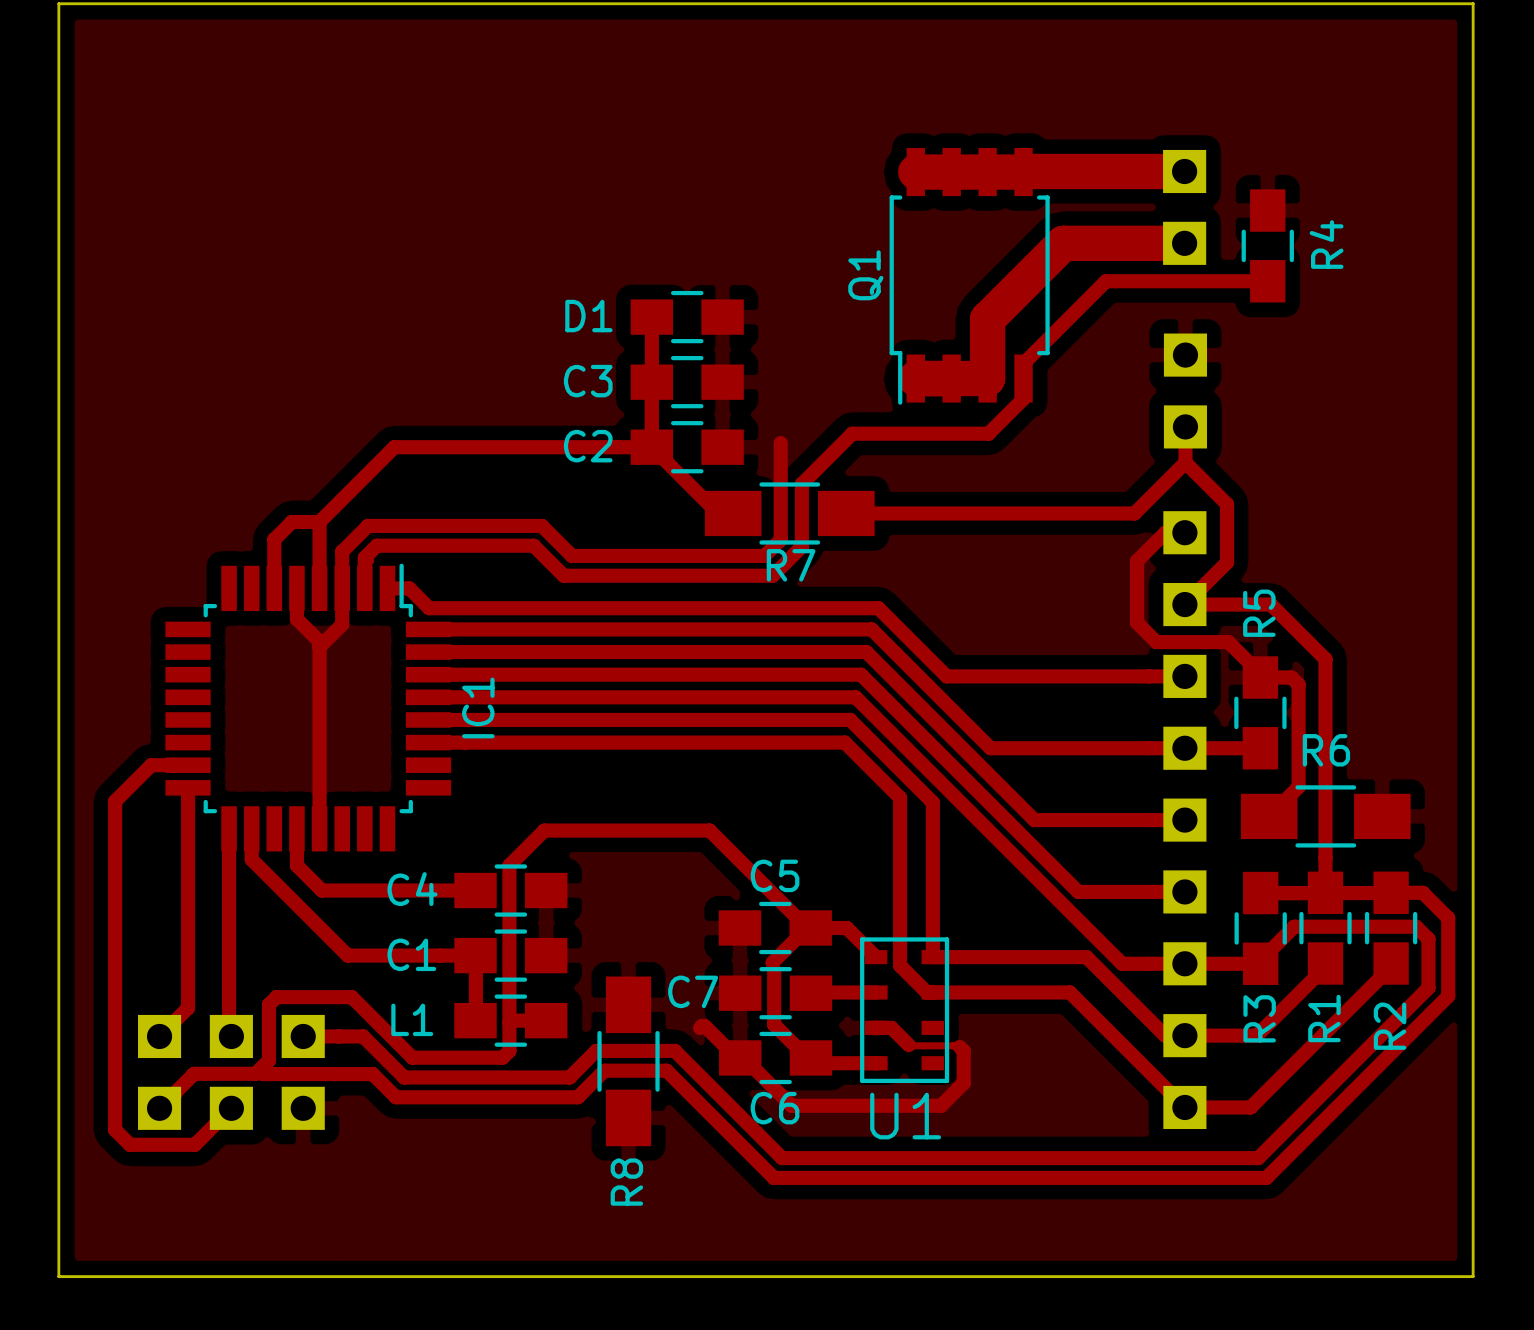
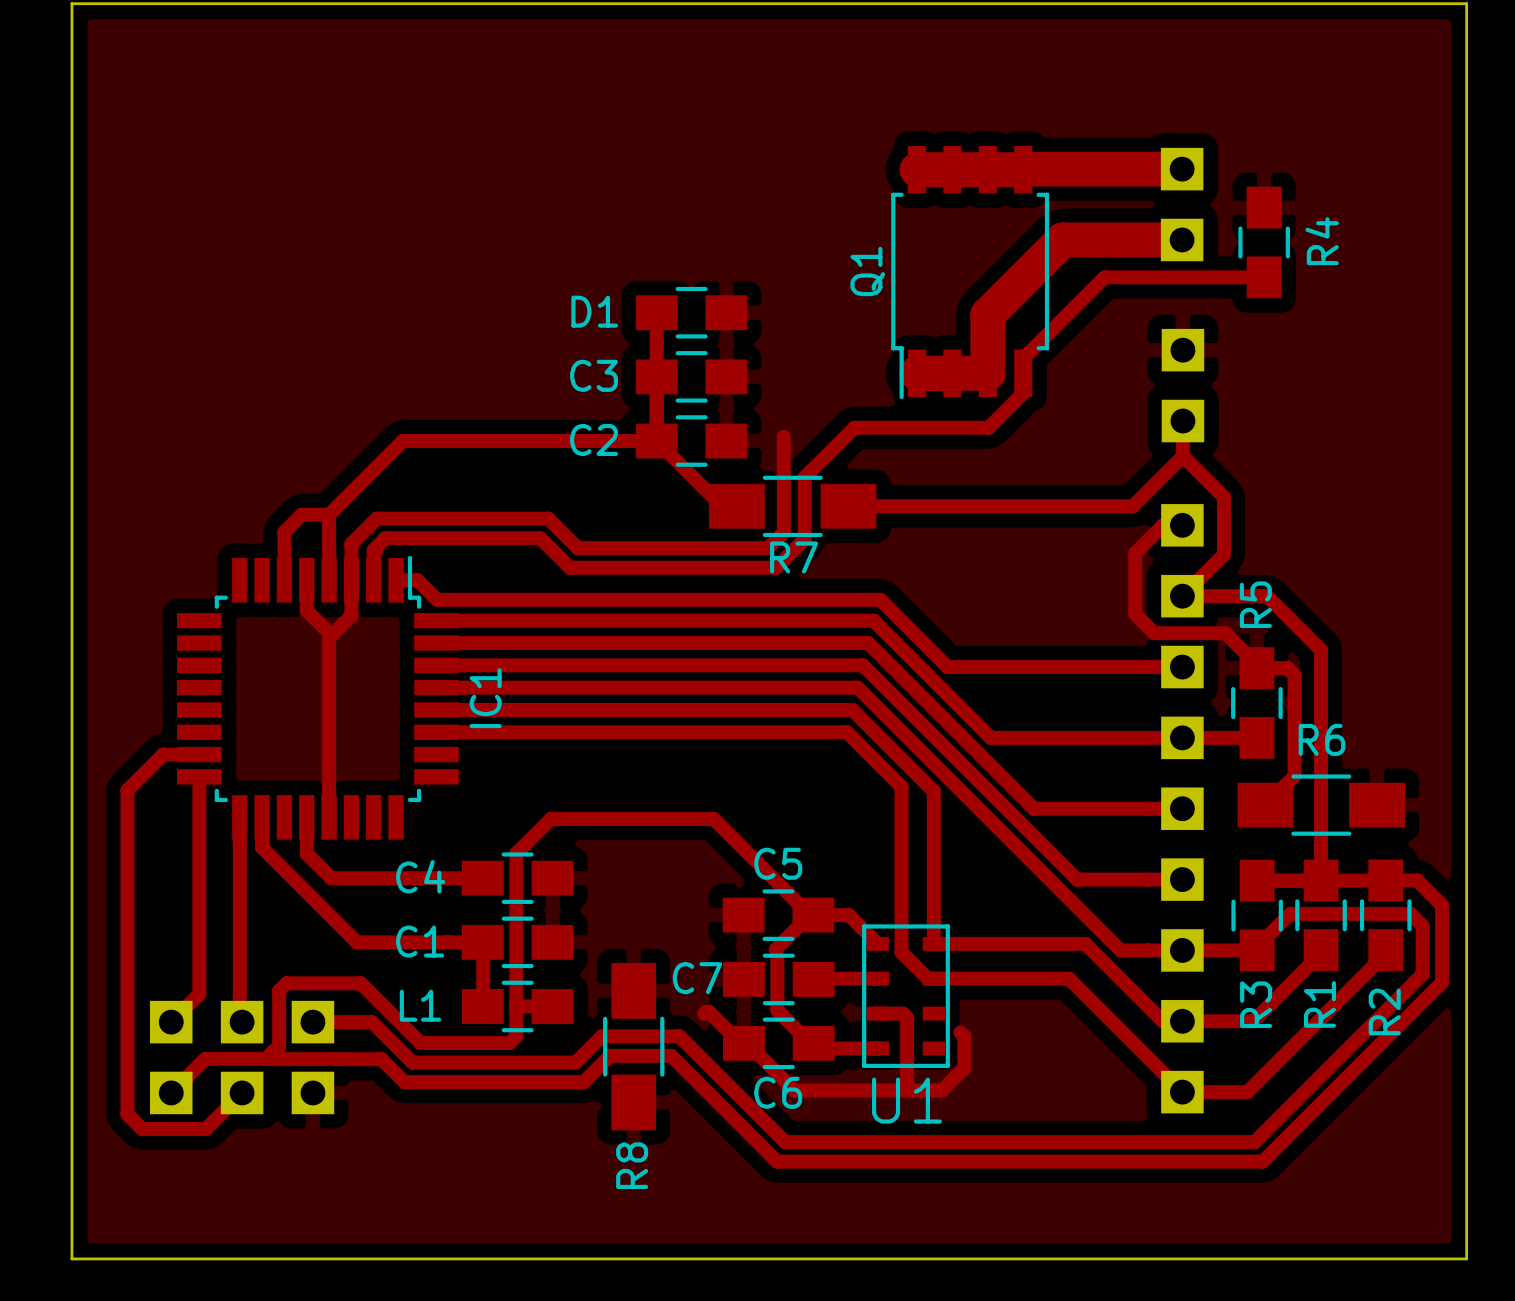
track: (891, 1027) (909, 1045) (957, 1045) -> (893, 1013) (903, 1013) (907, 1017) (907, 1082)

